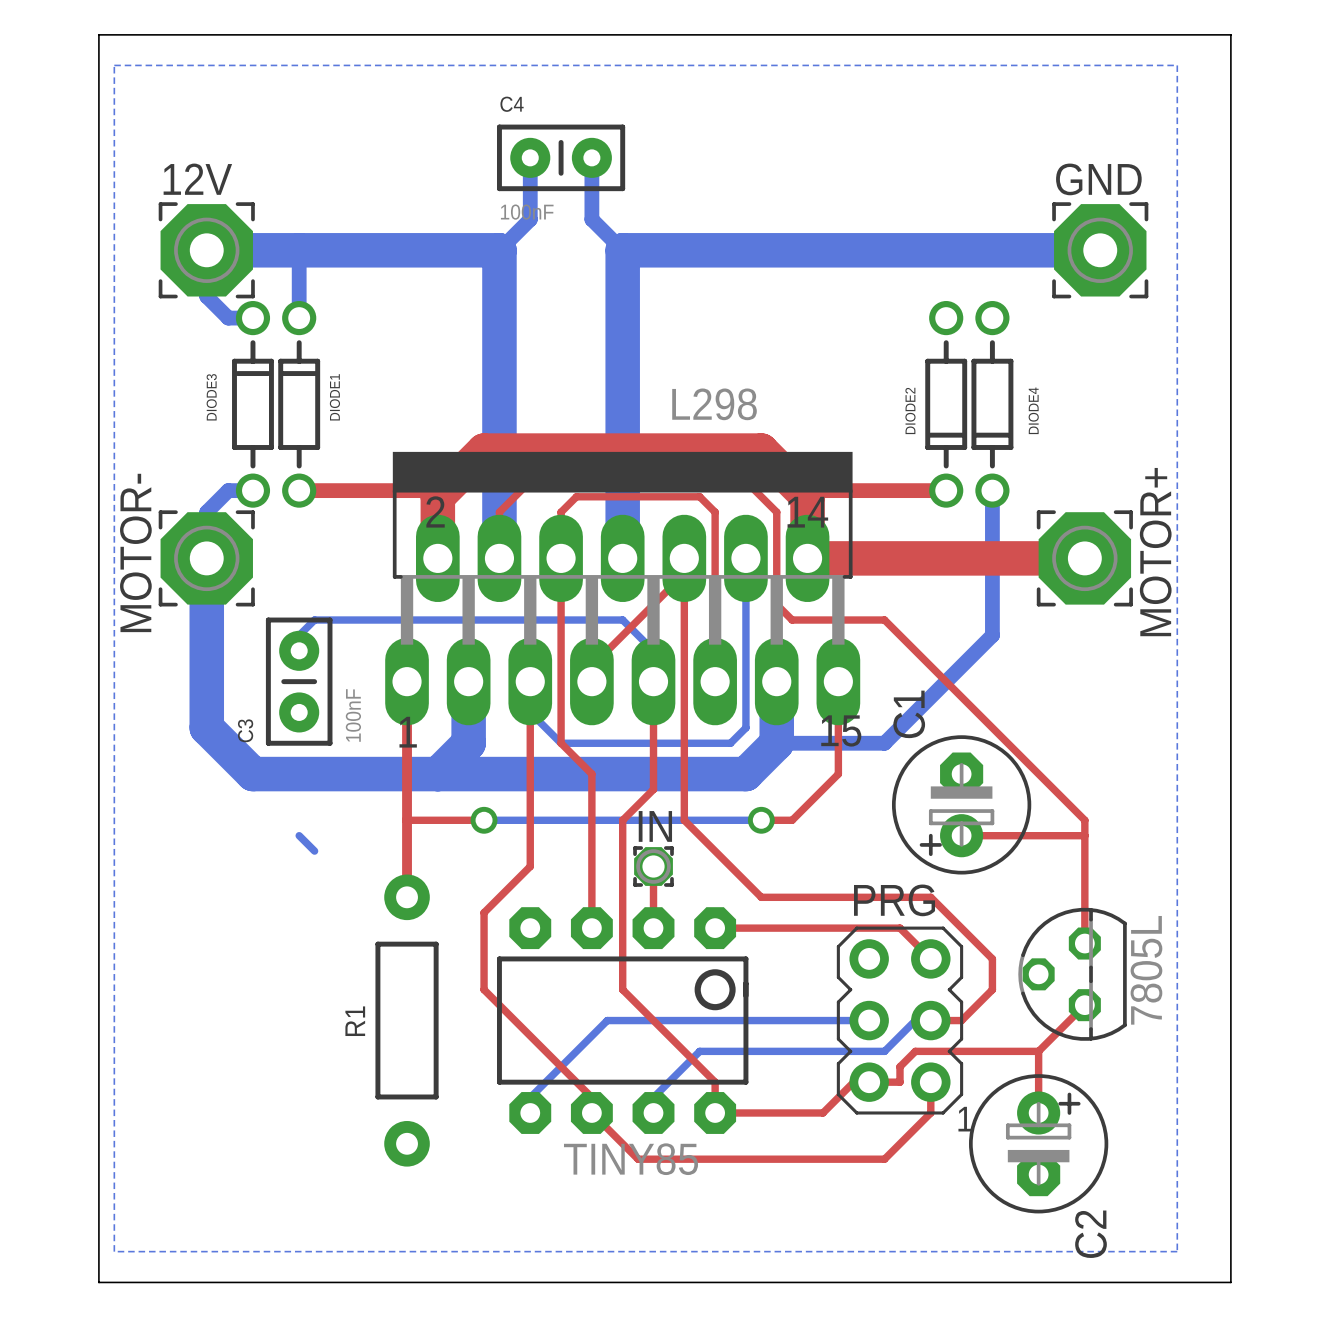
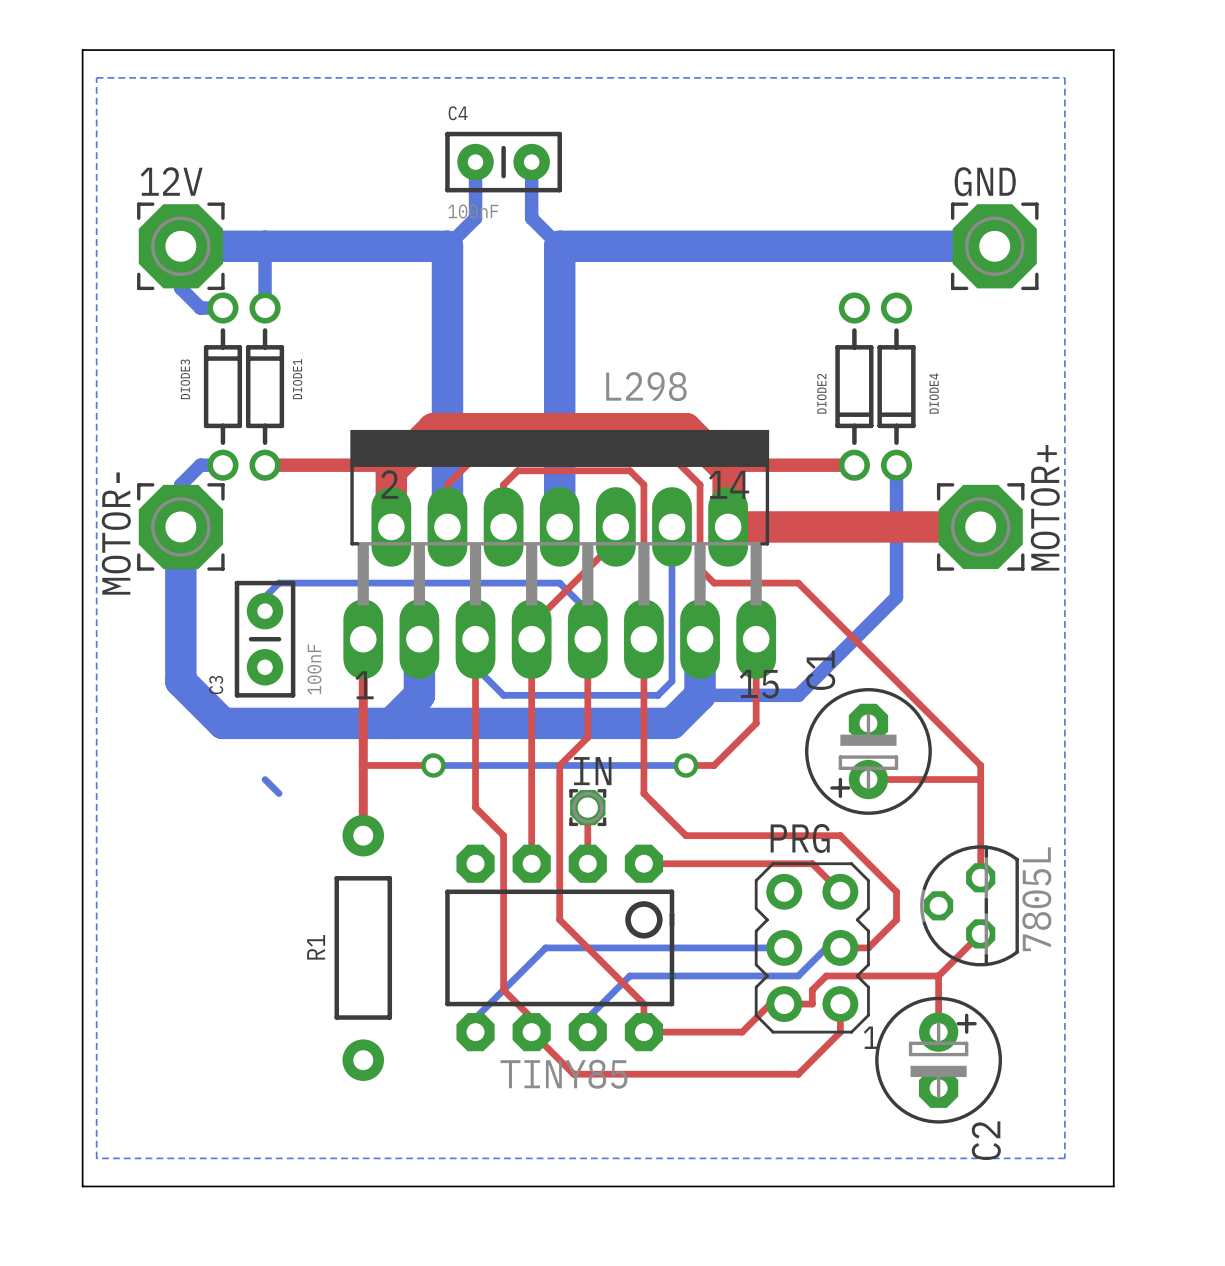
top track: (561, 558) (561, 743) (591, 774) -> (531, 639) (531, 723)
top track: (684, 573) (684, 820) (715, 851) -> (643, 639) (643, 793)
top track: (530, 866) (484, 912) (484, 989) (561, 1066) -> (475, 807) (503, 835) (503, 990)

